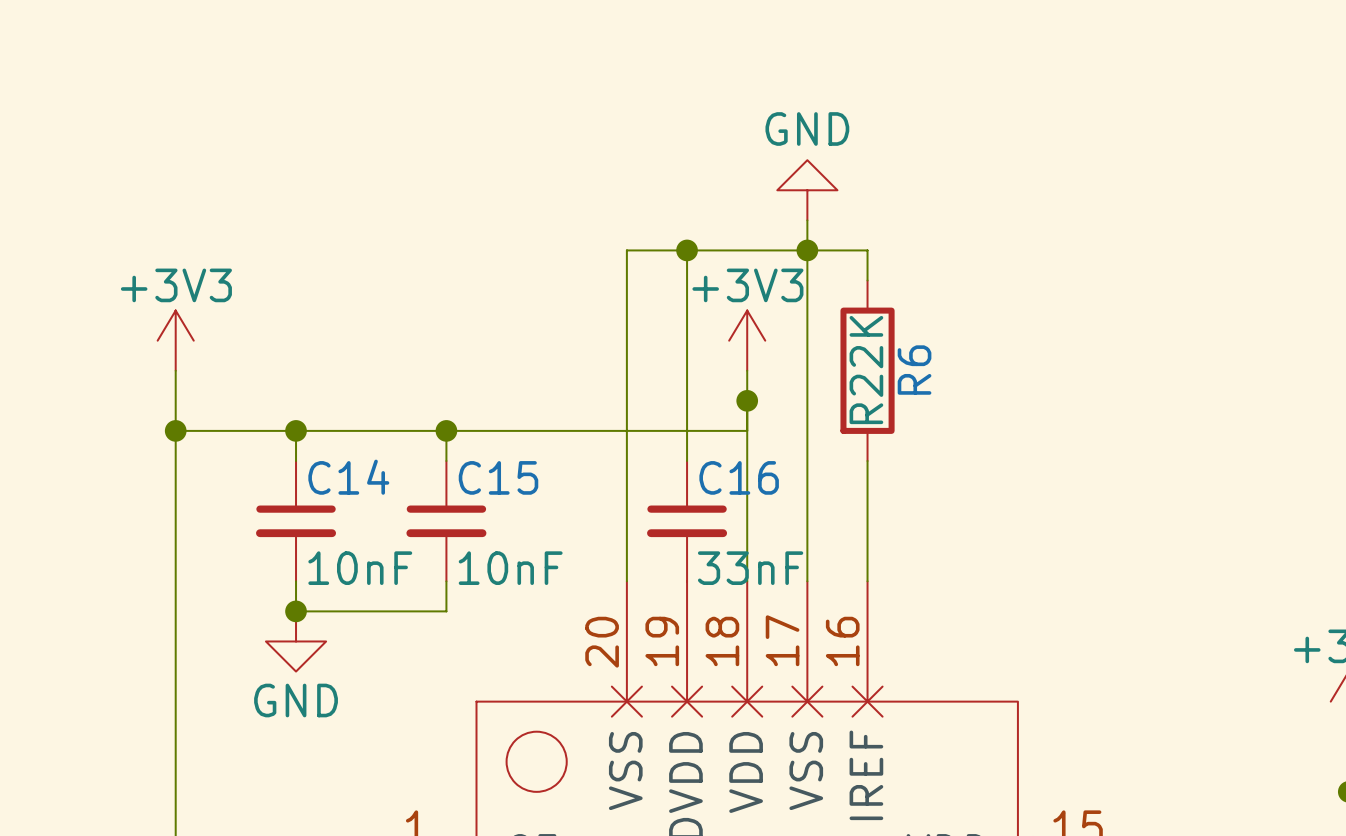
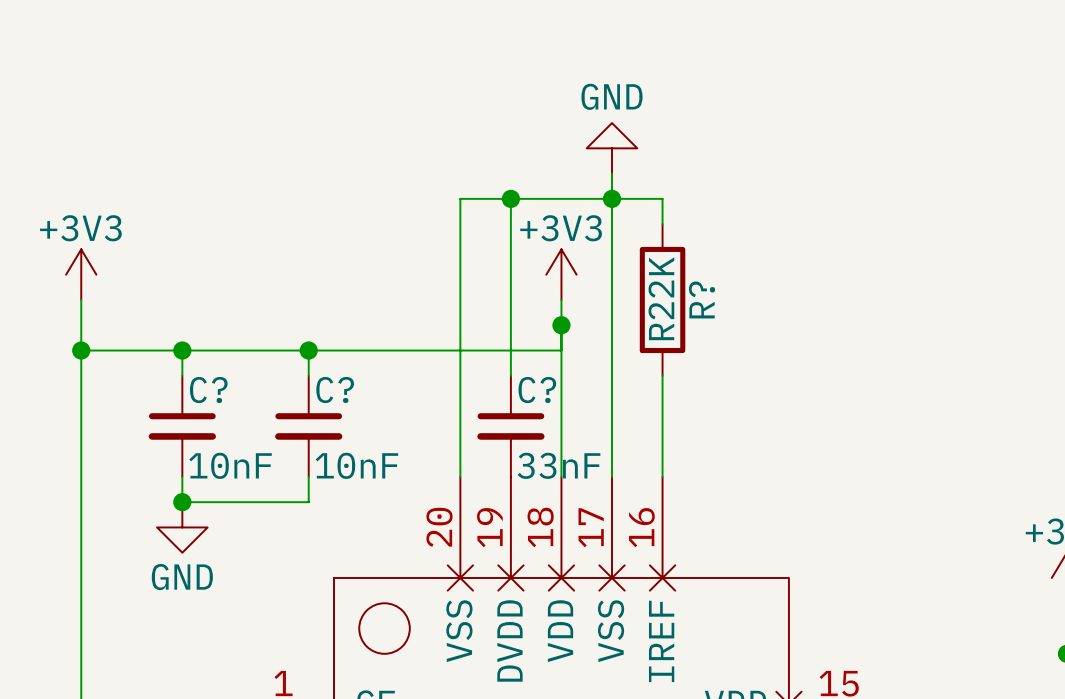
R6 name: R6 (914, 370) -> R? (701, 299)
C14 name: C14 (348, 477) -> C? (208, 390)
C15 name: C15 (498, 477) -> C? (335, 390)
C16 name: C16 (739, 477) -> C? (537, 390)

